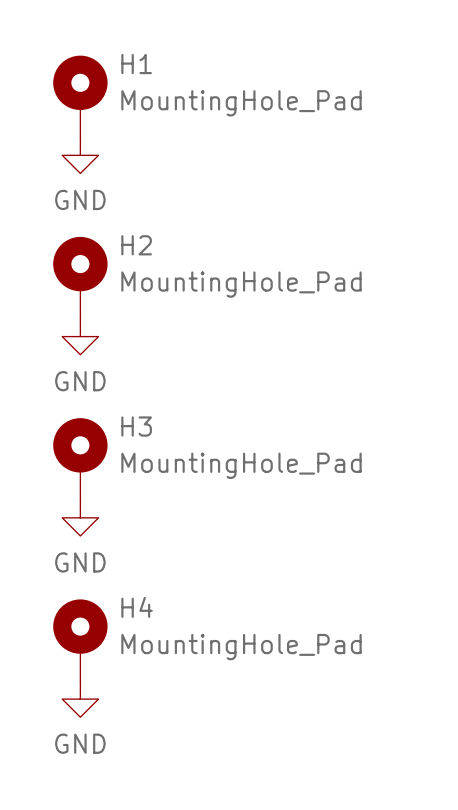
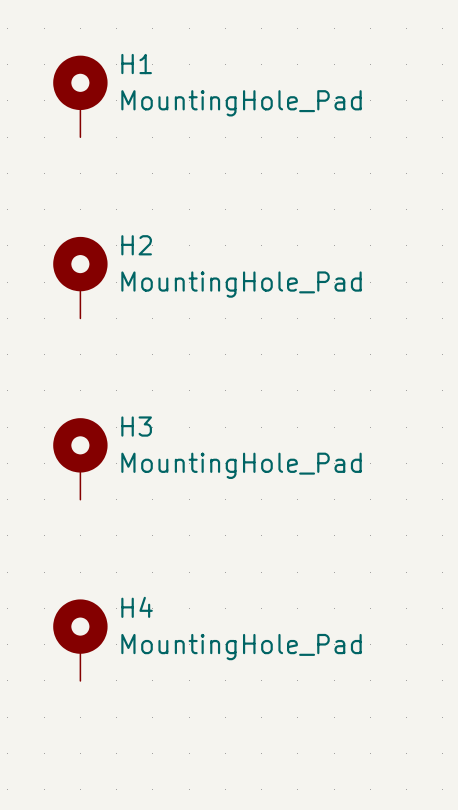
power symbol: GND (80, 155) -> none
power symbol: GND (80, 336) -> none
power symbol: GND (80, 517) -> none
power symbol: GND (80, 699) -> none

